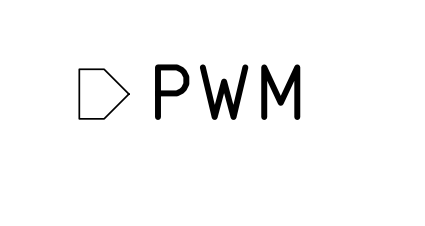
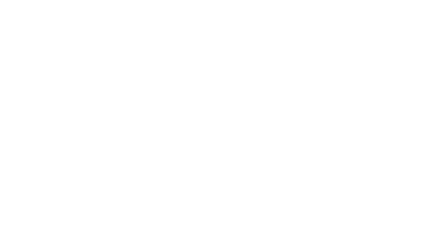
hierarchical label: PWM (227, 92) -> none

